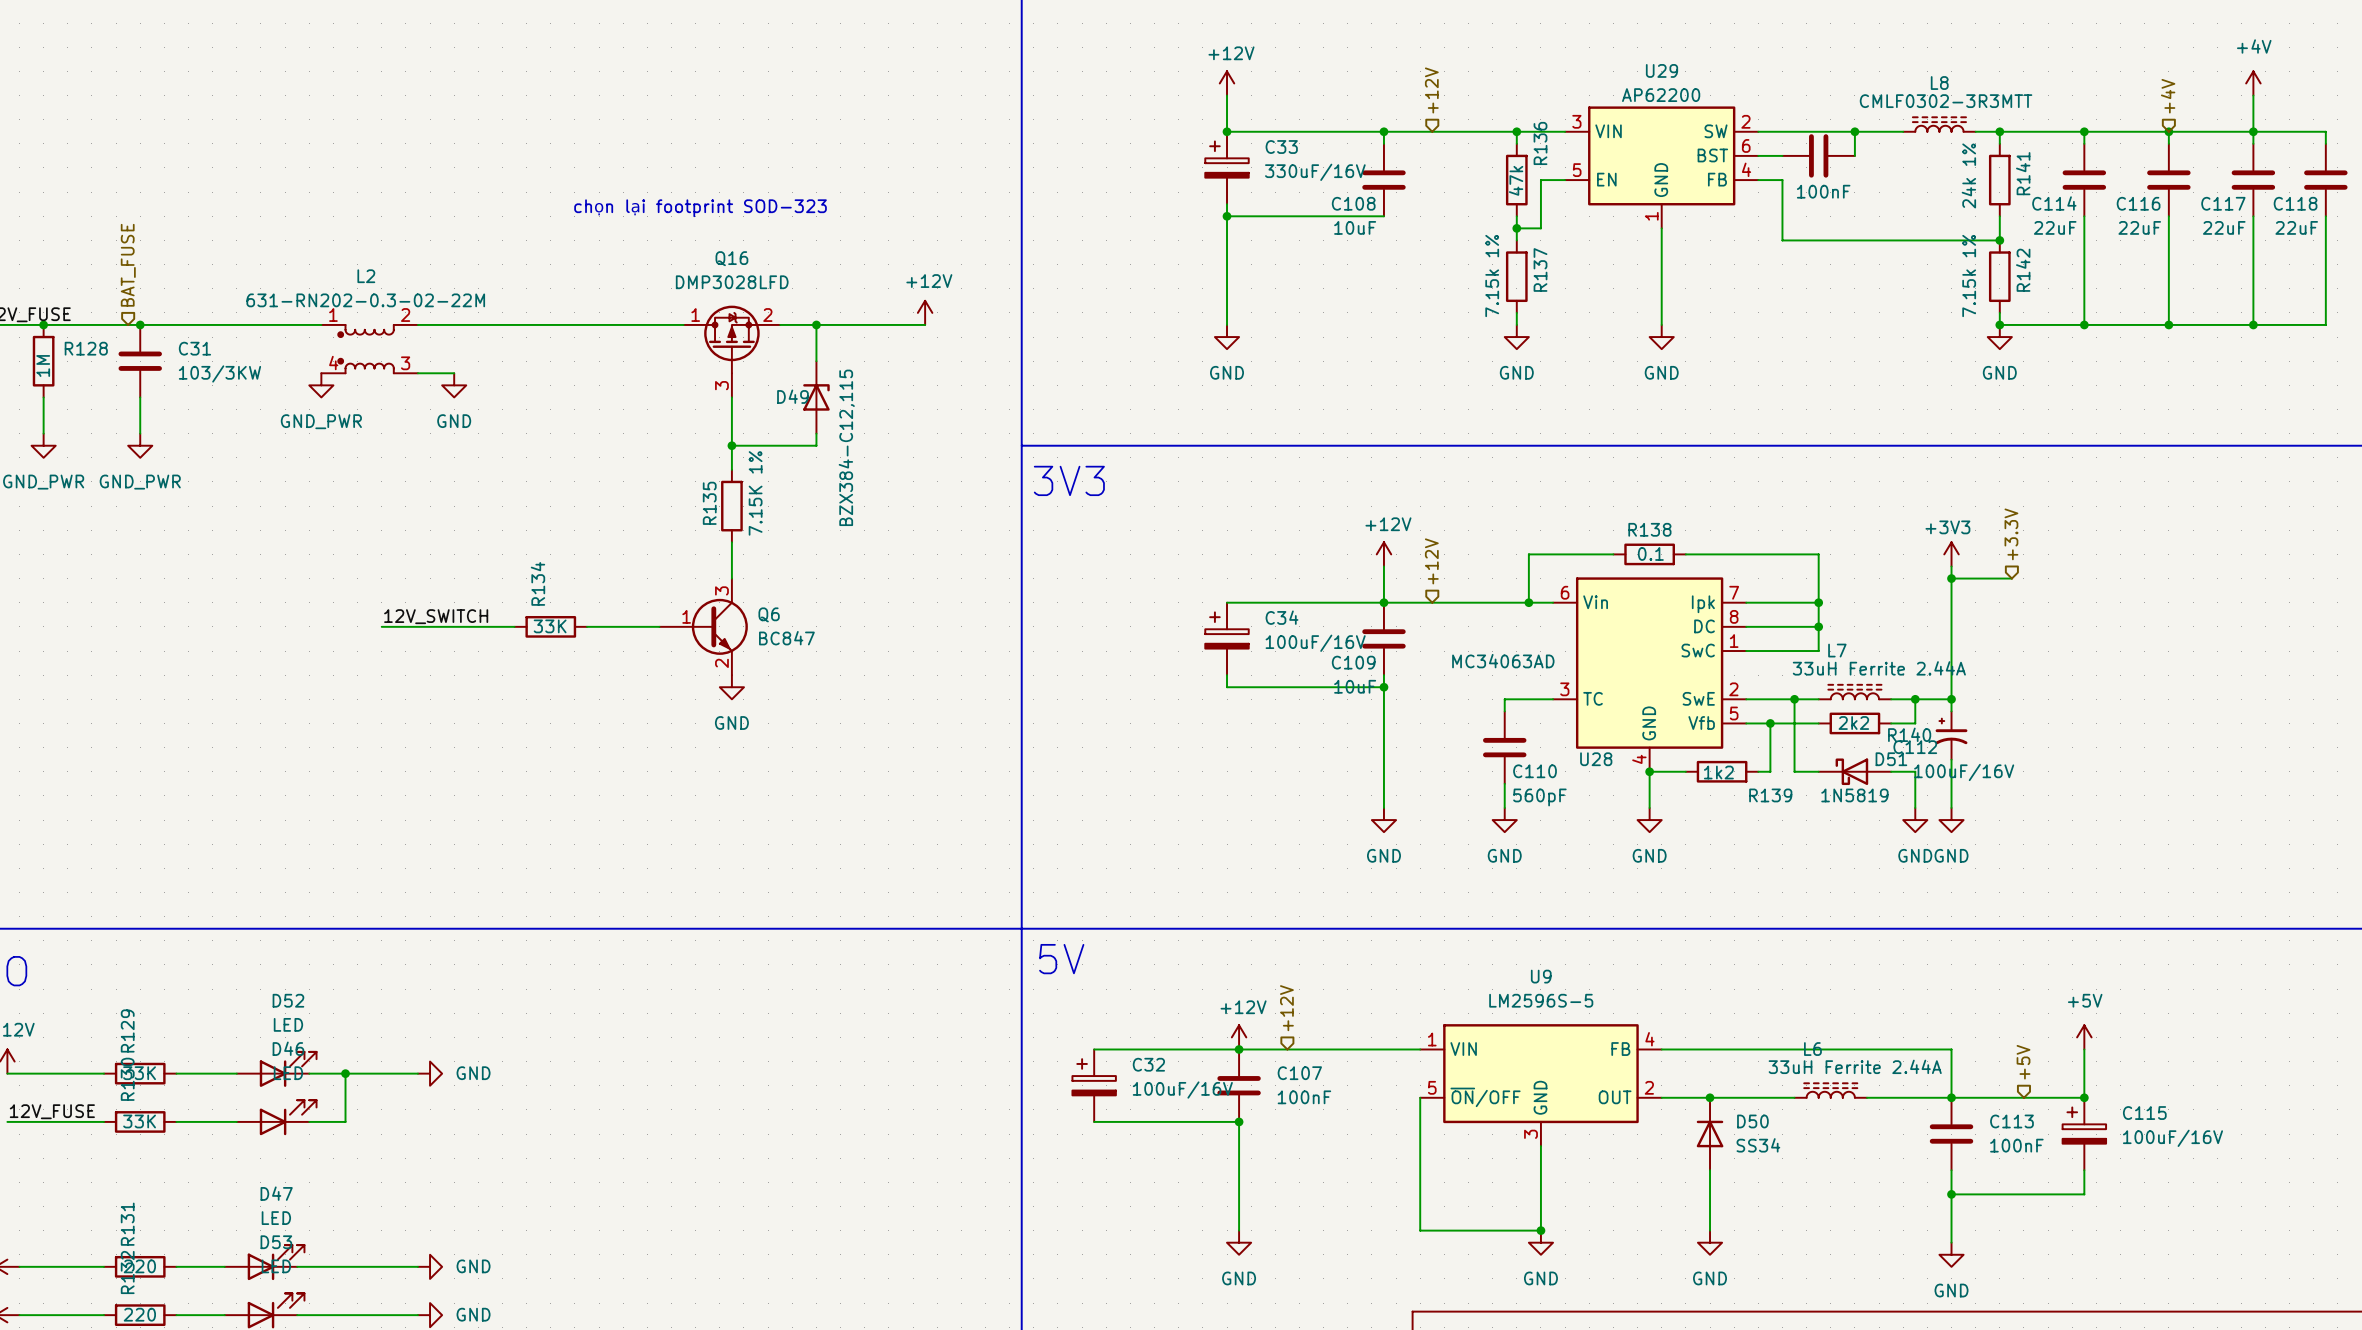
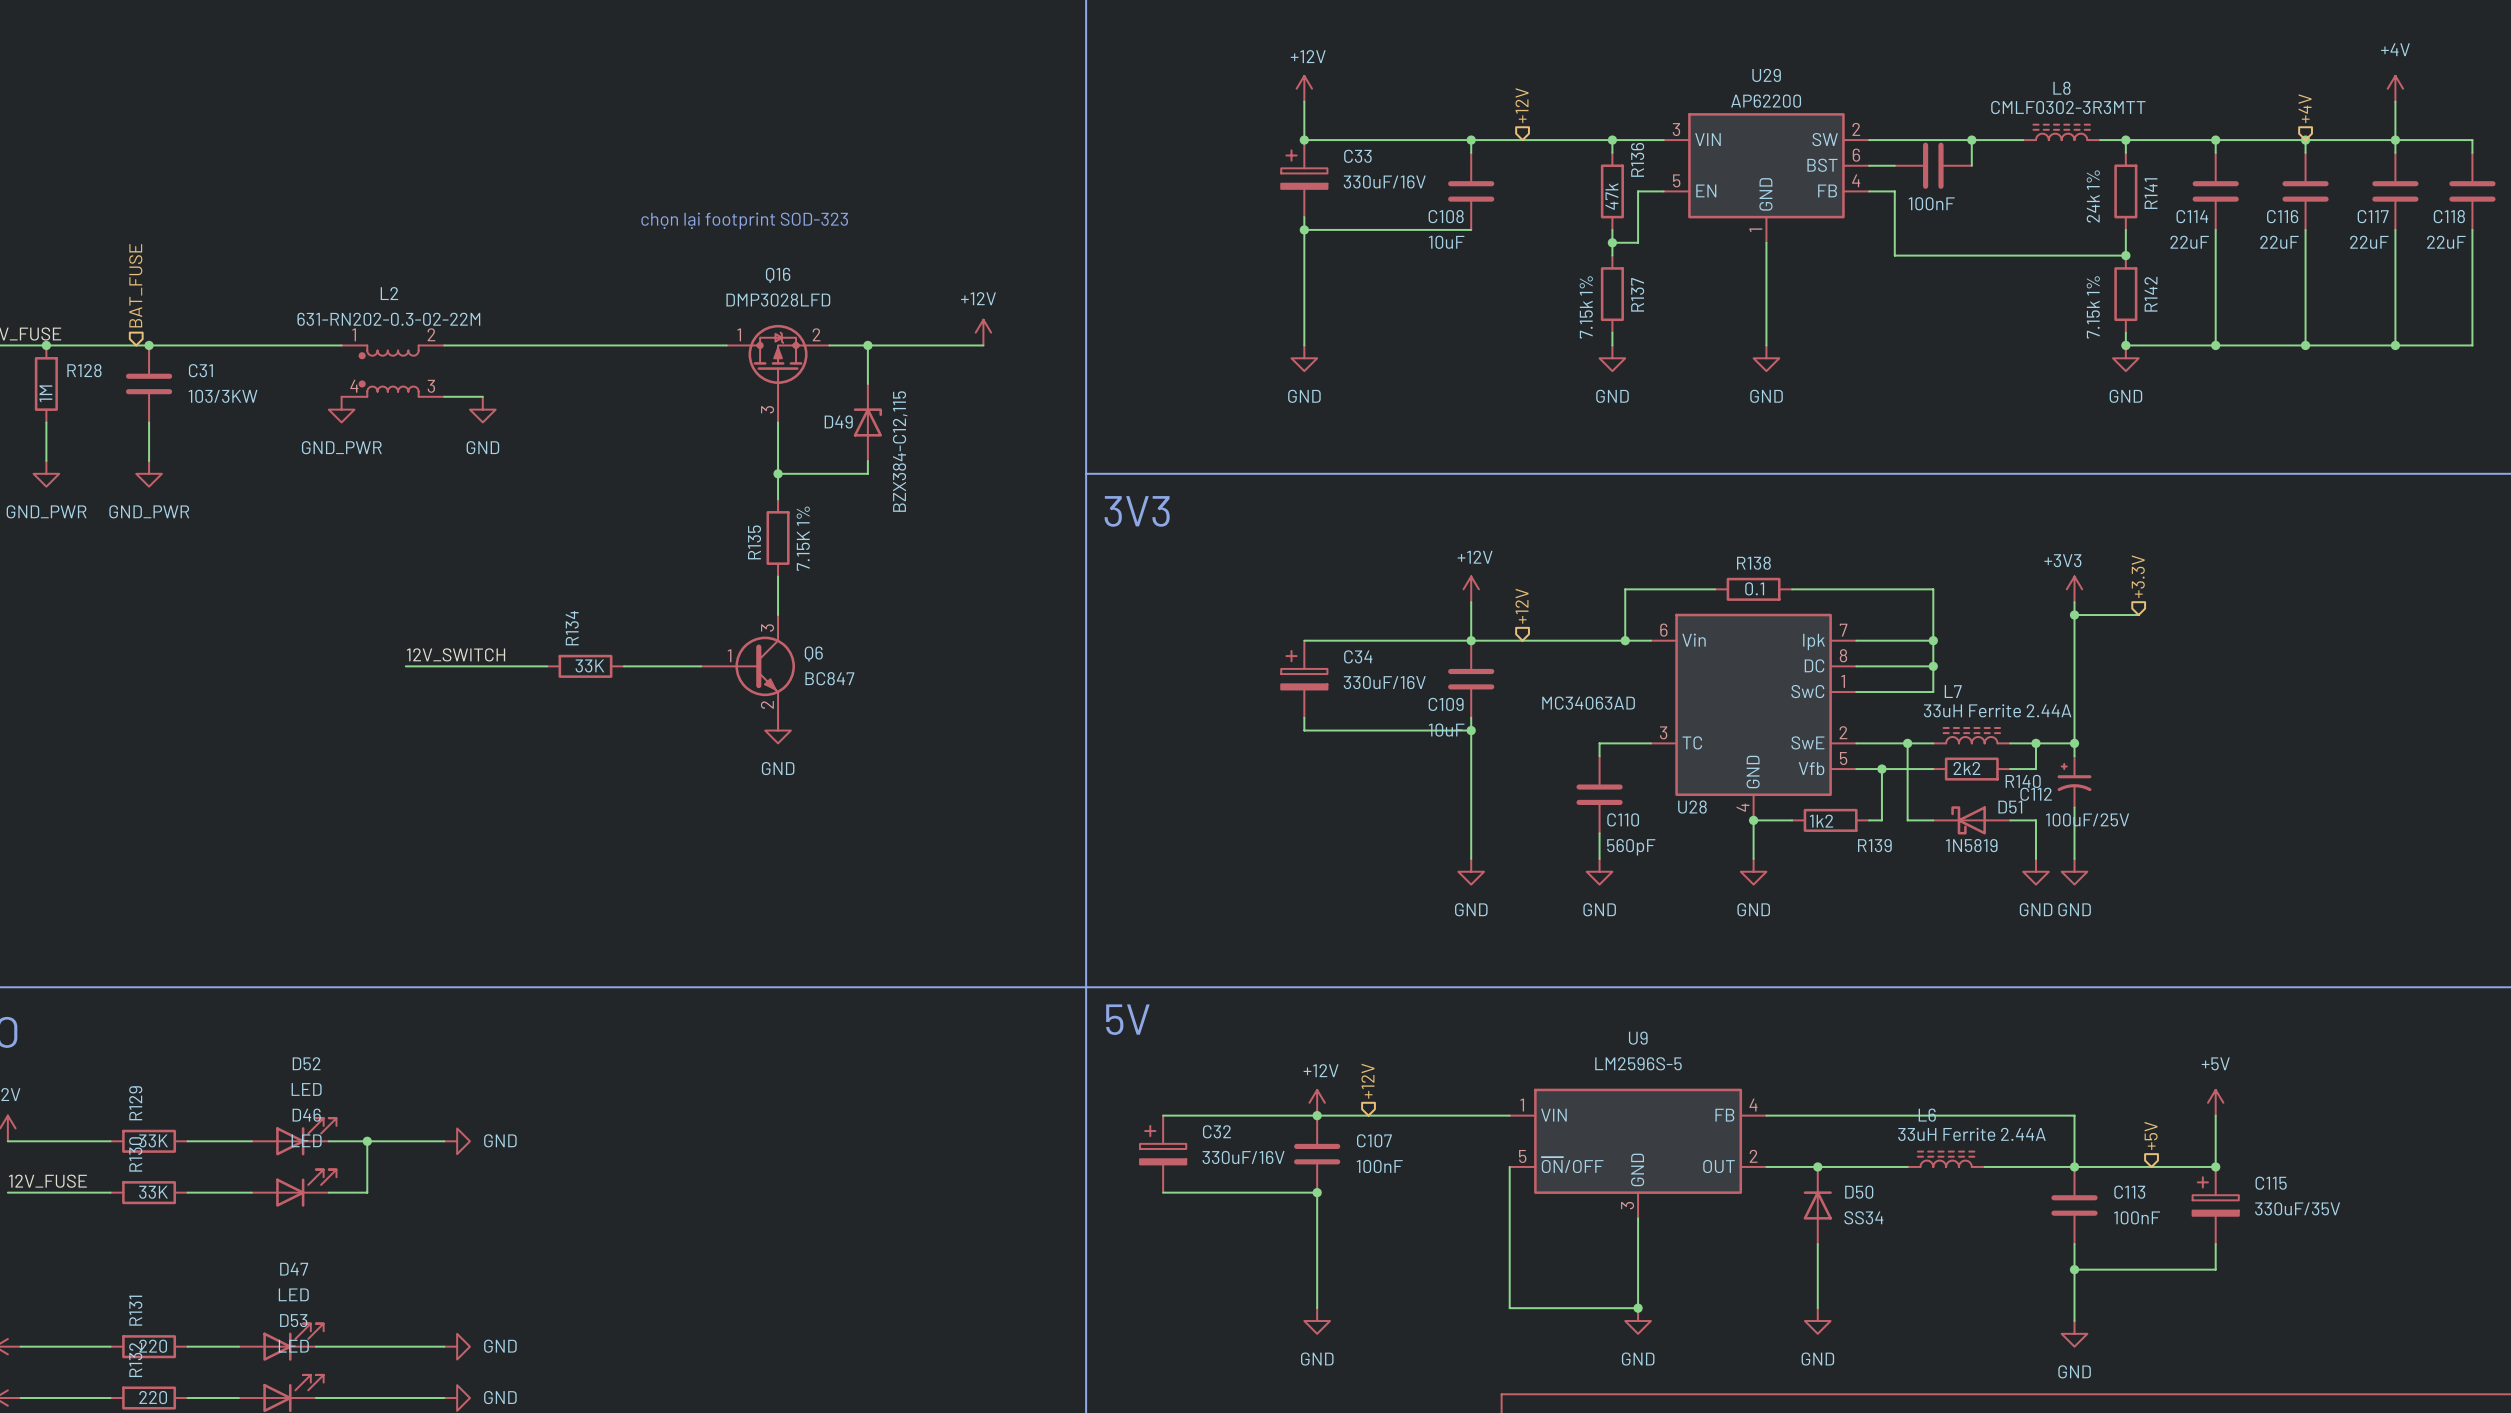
C34 value: 100uF/16V (1315, 643) -> 330uF/16V (1384, 682)
C112 value: 100uF/16V (1964, 772) -> 100uF/25V (2087, 819)
C32 value: 100uF/16V (1182, 1090) -> 330uF/16V (1243, 1157)
C115 value: 100uF/16V (2172, 1138) -> 330uF/35V (2297, 1208)

